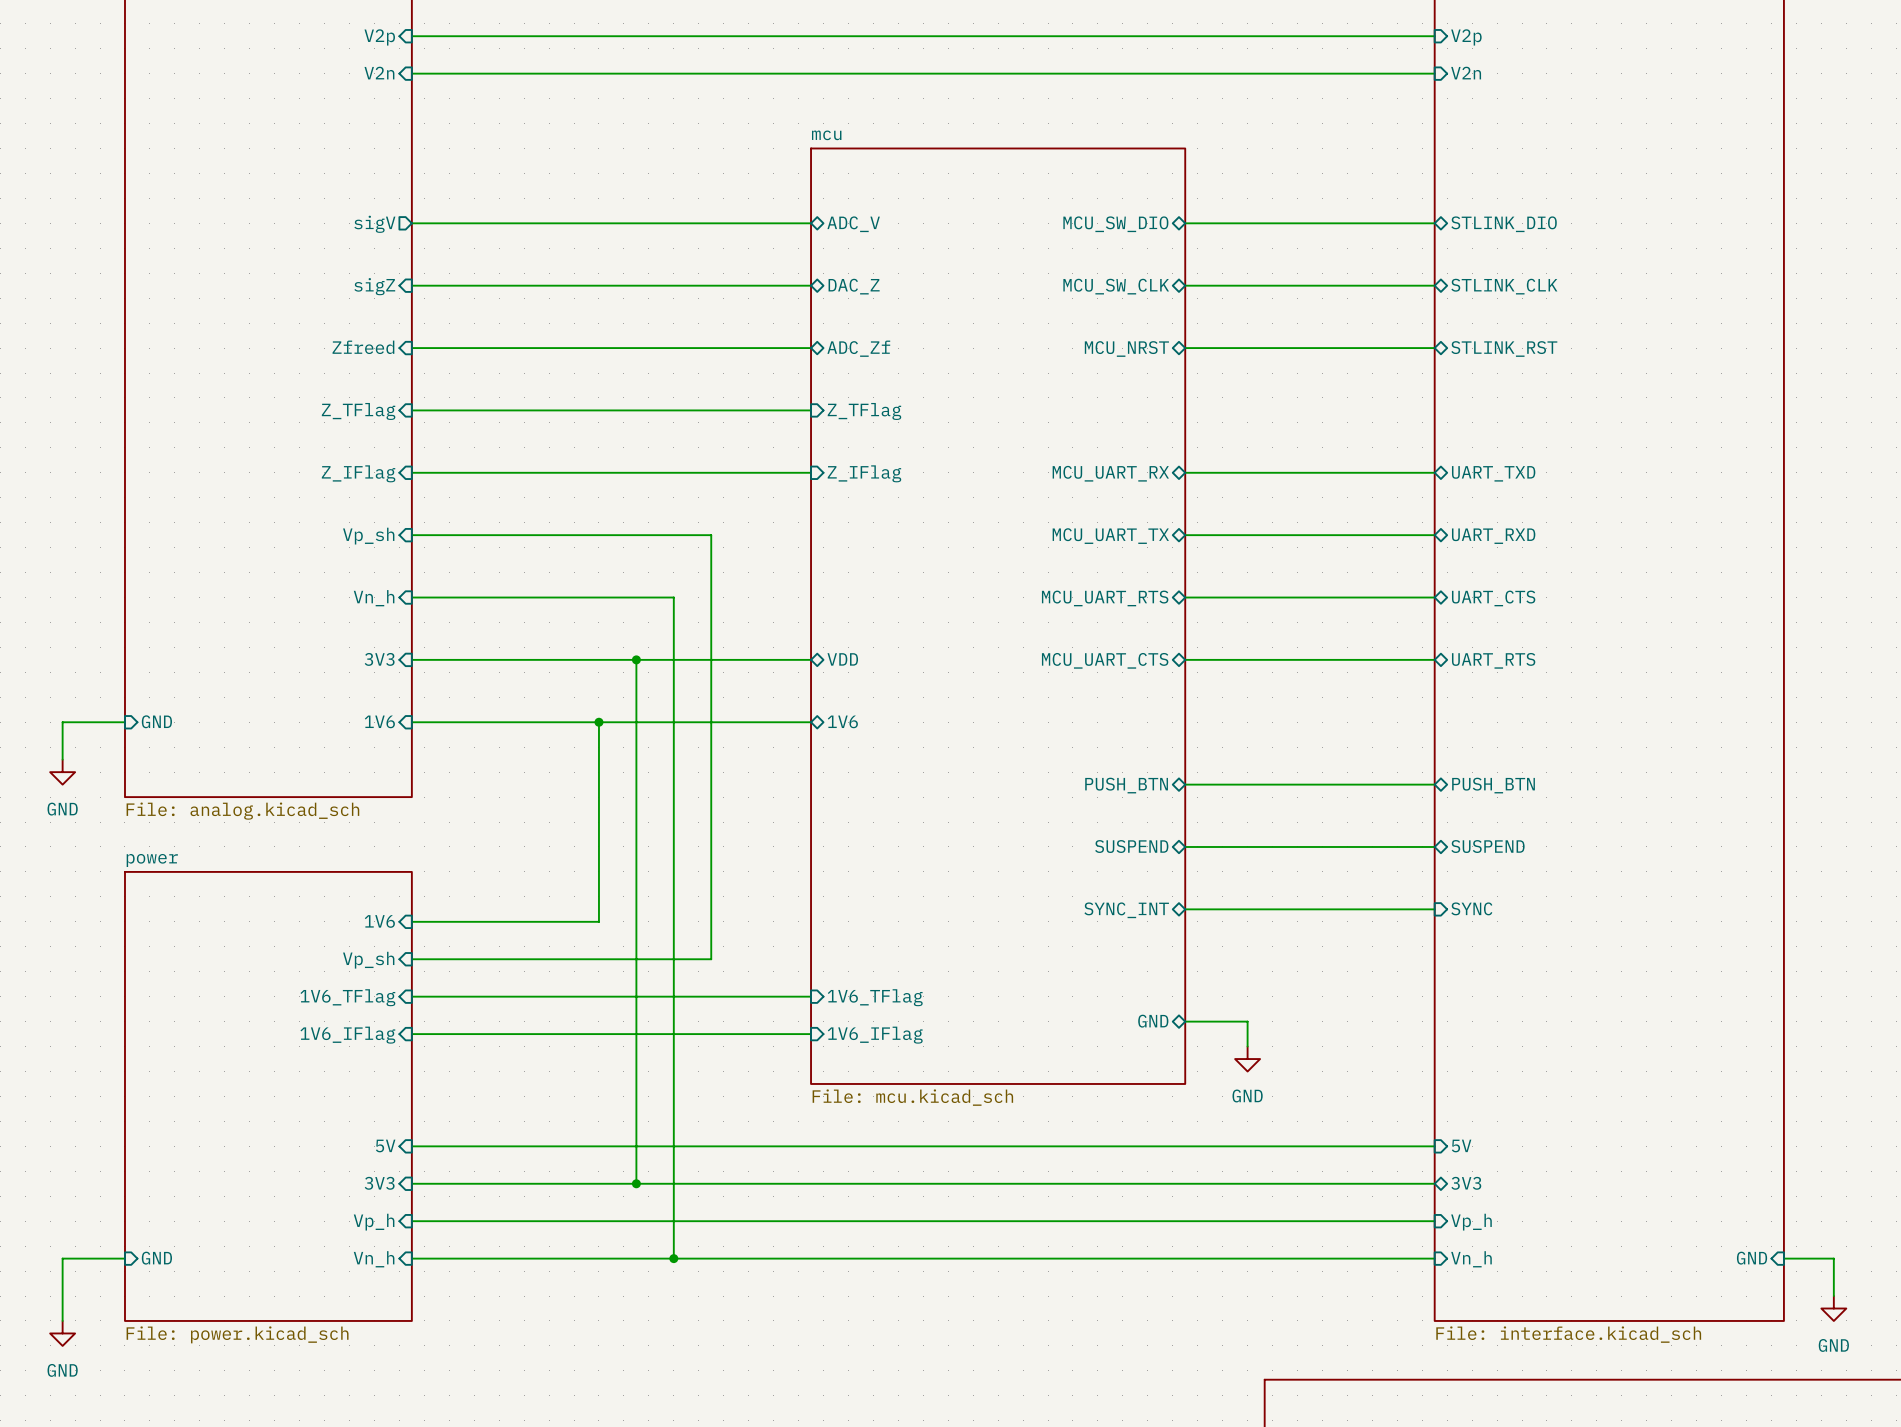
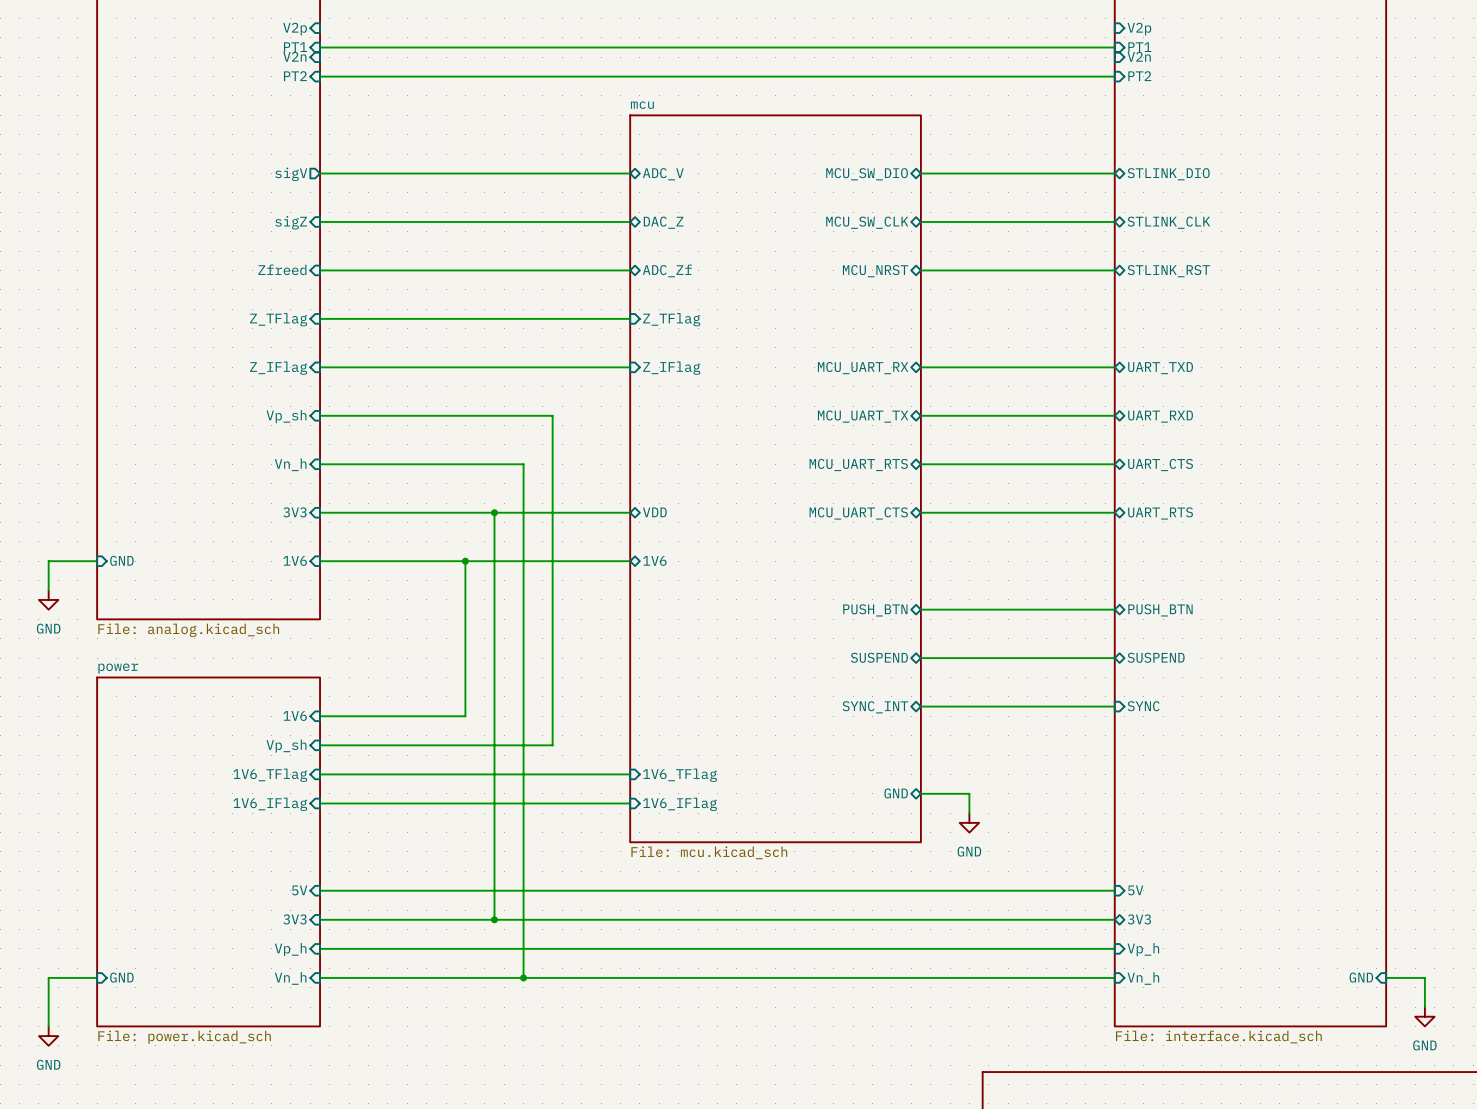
wire: (411, 36) (1434, 36) -> (320, 47) (1114, 47)
sheet pin: none -> PT1 (295, 47)
sheet pin: none -> PT1 (1139, 47)
wire: (411, 73) (1434, 73) -> (320, 76) (1114, 76)
sheet pin: none -> PT2 (295, 76)
sheet pin: none -> PT2 (1139, 76)

